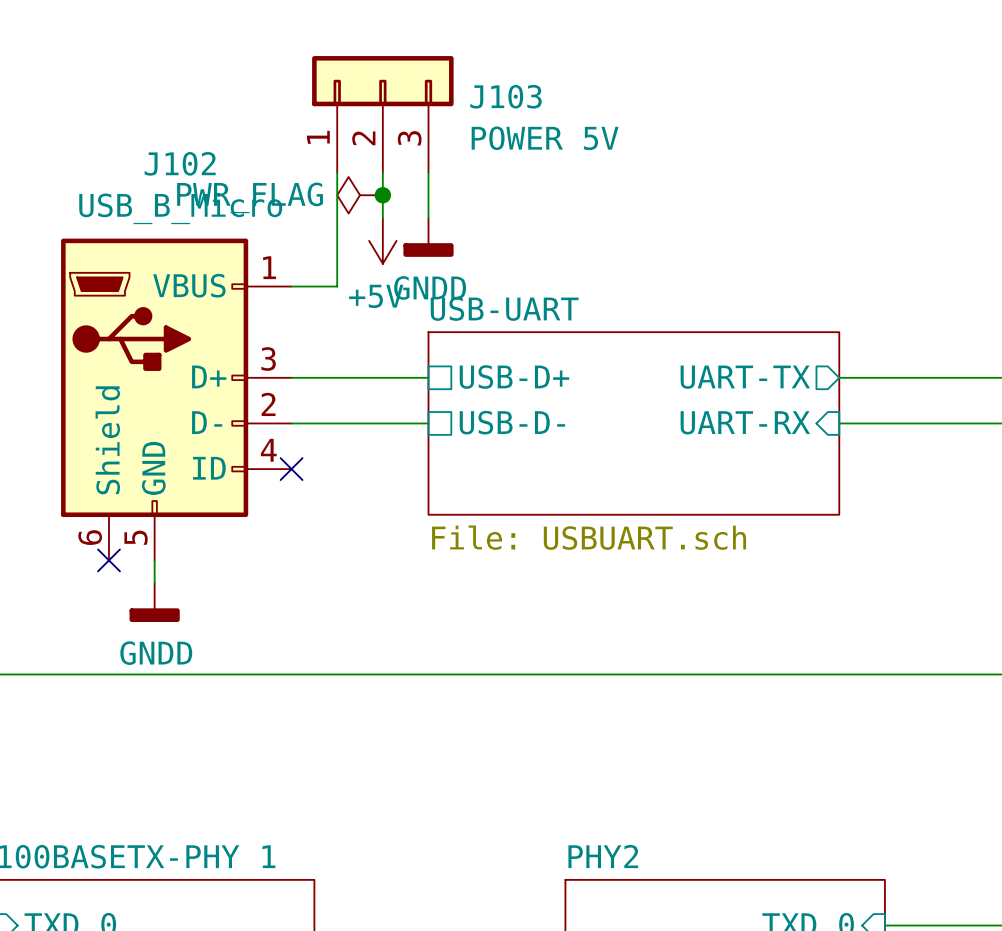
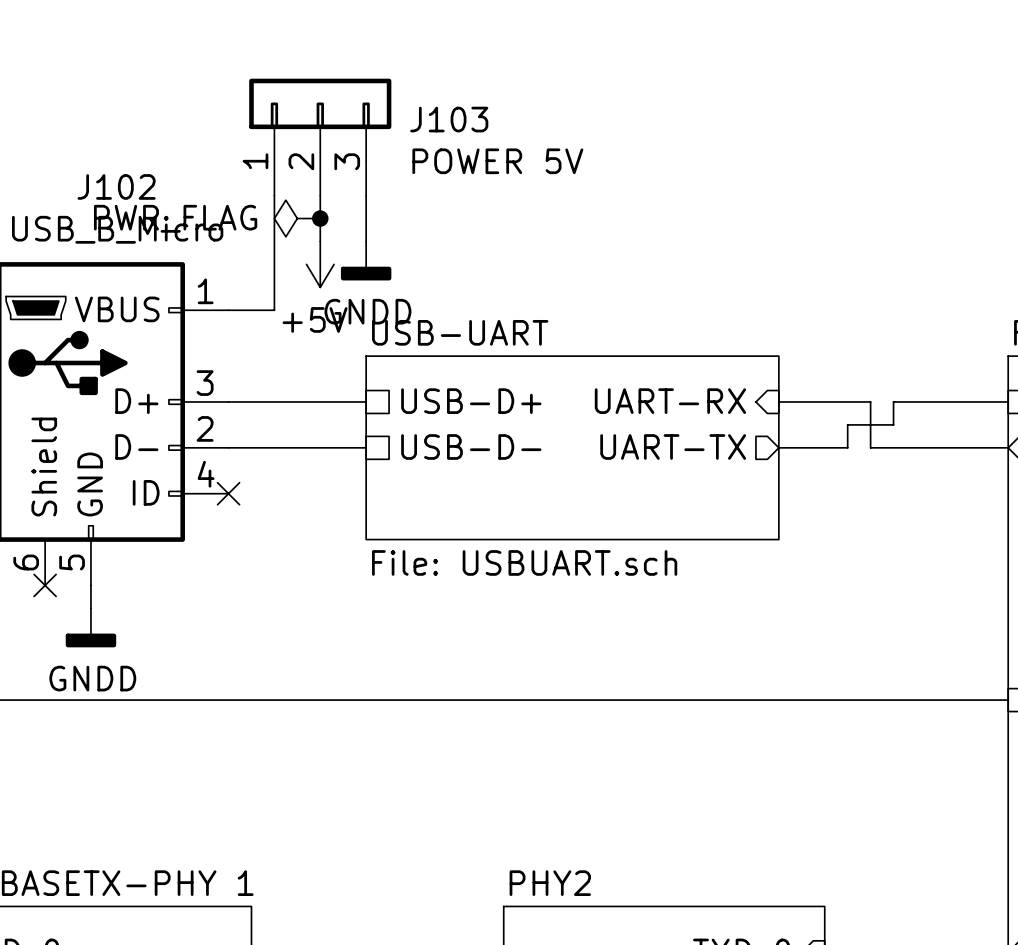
sheet pin shape: output (745, 377) -> input (670, 401)
sheet pin: UART-TX (745, 377) -> UART-RX (670, 401)
wire: (930, 377) (953, 377) -> (870, 401) (870, 447)
sheet pin shape: input (745, 422) -> output (673, 446)
sheet pin: UART-RX (745, 422) -> UART-TX (673, 446)
wire: (907, 423) (930, 423) -> (847, 447) (847, 424) (893, 424) (893, 401)

